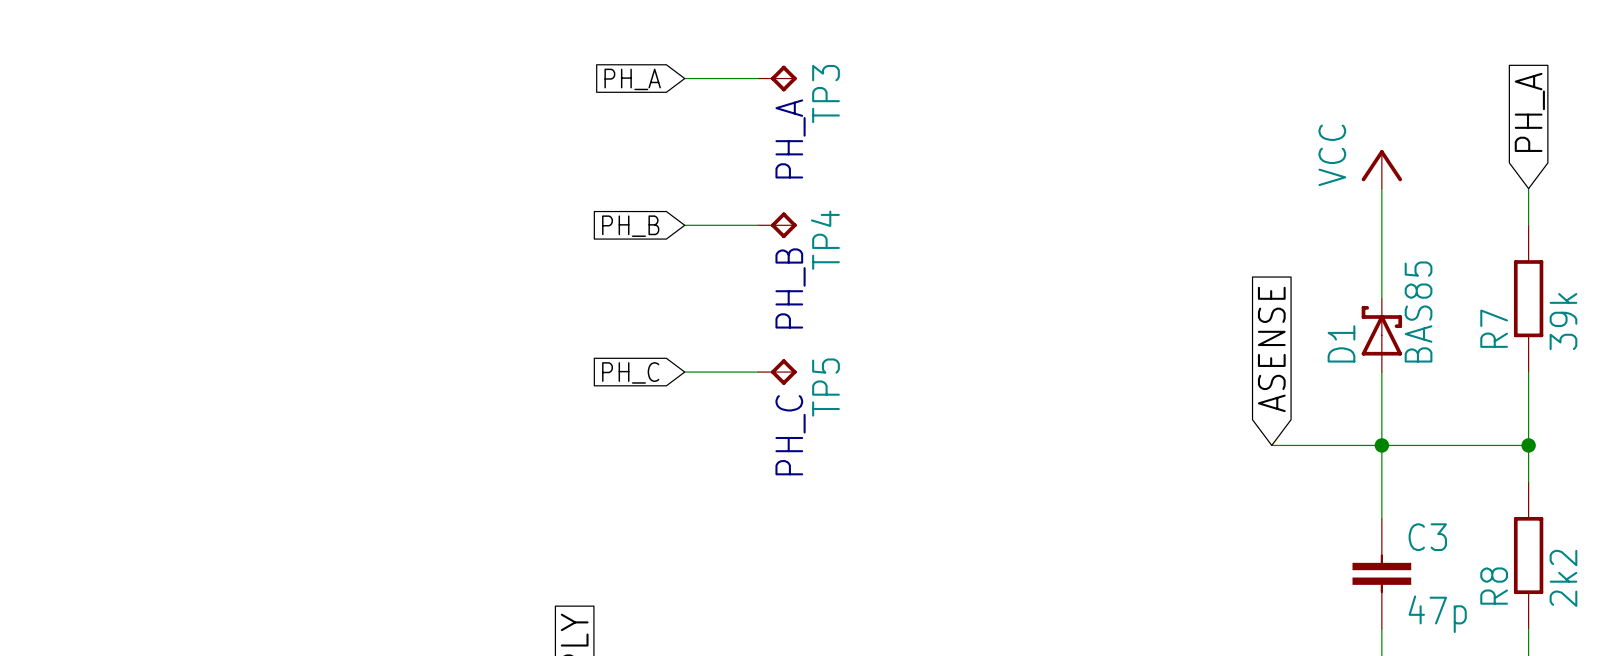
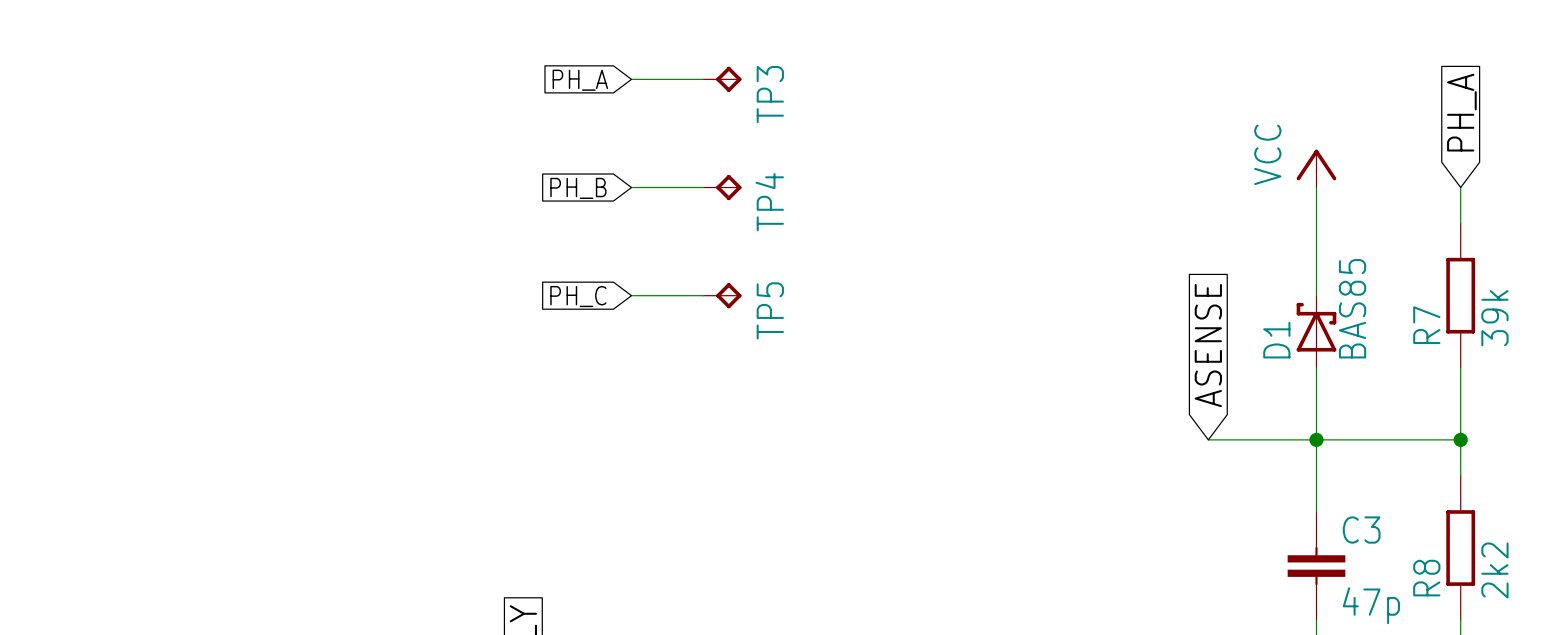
TP3 value: PH_A (790, 138) -> none
wire: (684, 225) (758, 225) -> (631, 187) (703, 187)
TP4 position: (777, 225) -> (722, 187)
global label position: PH_B (630, 226) -> PH_B (578, 188)
TP4 value: PH_B (790, 288) -> none
global label position: PH_C (630, 372) -> PH_C (578, 296)
wire: (684, 372) (758, 372) -> (631, 295) (703, 295)
TP5 position: (777, 372) -> (722, 295)
TP5 value: PH_C (790, 435) -> none

